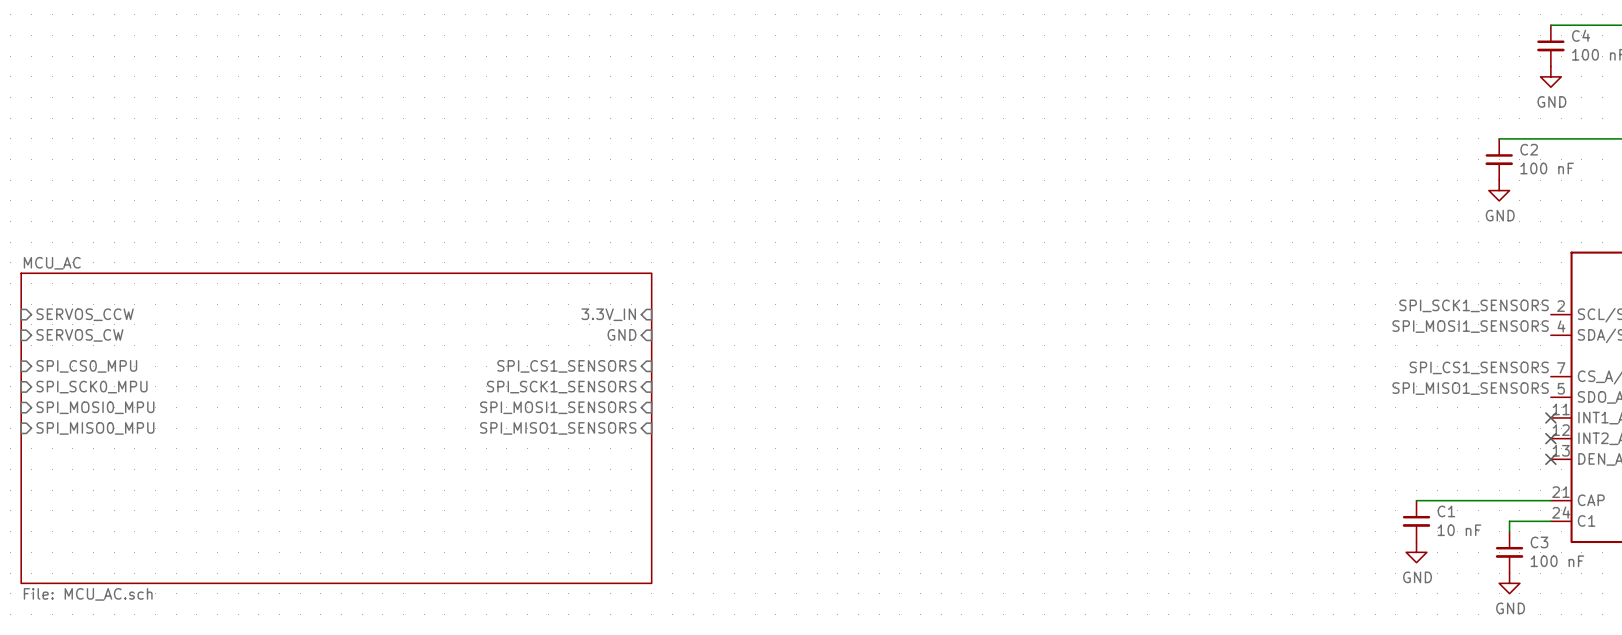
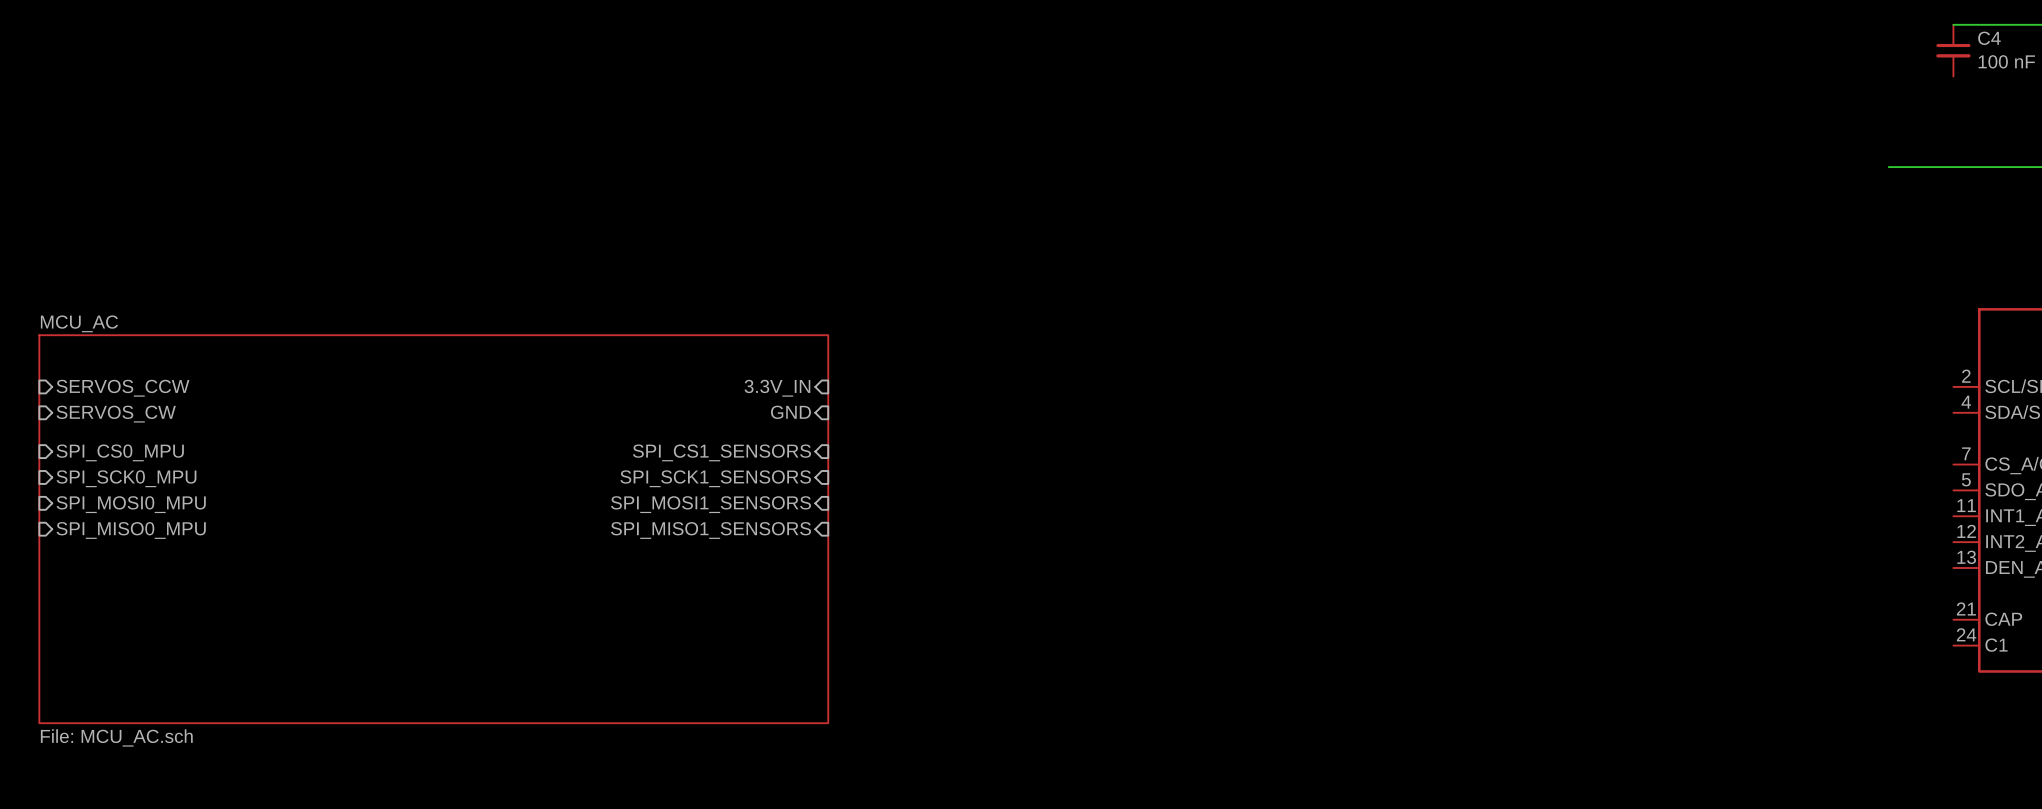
power symbol: GND (1550, 76) -> none
C2: 100 nF (1499, 159) -> none
power symbol: GND (1499, 190) -> none
label: SPI_SCK1_SENSORS (1474, 305) -> none
label: SPI_MOSI1_SENSORS (1470, 326) -> none
label: SPI_CS1_SENSORS (1479, 367) -> none
label: SPI_MISO1_SENSORS (1470, 388) -> none
no-connect mark: (1550, 417) -> none
no-connect mark: (1550, 438) -> none
no-connect mark: (1550, 459) -> none
wire: (1416, 500) (1550, 500) -> none
C1: 10 nF (1416, 521) -> none
wire: (1550, 521) (1509, 521) (1509, 531) -> none
power symbol: GND (1416, 552) -> none
C3: 100 nF (1509, 552) -> none
power symbol: GND (1509, 583) -> none

